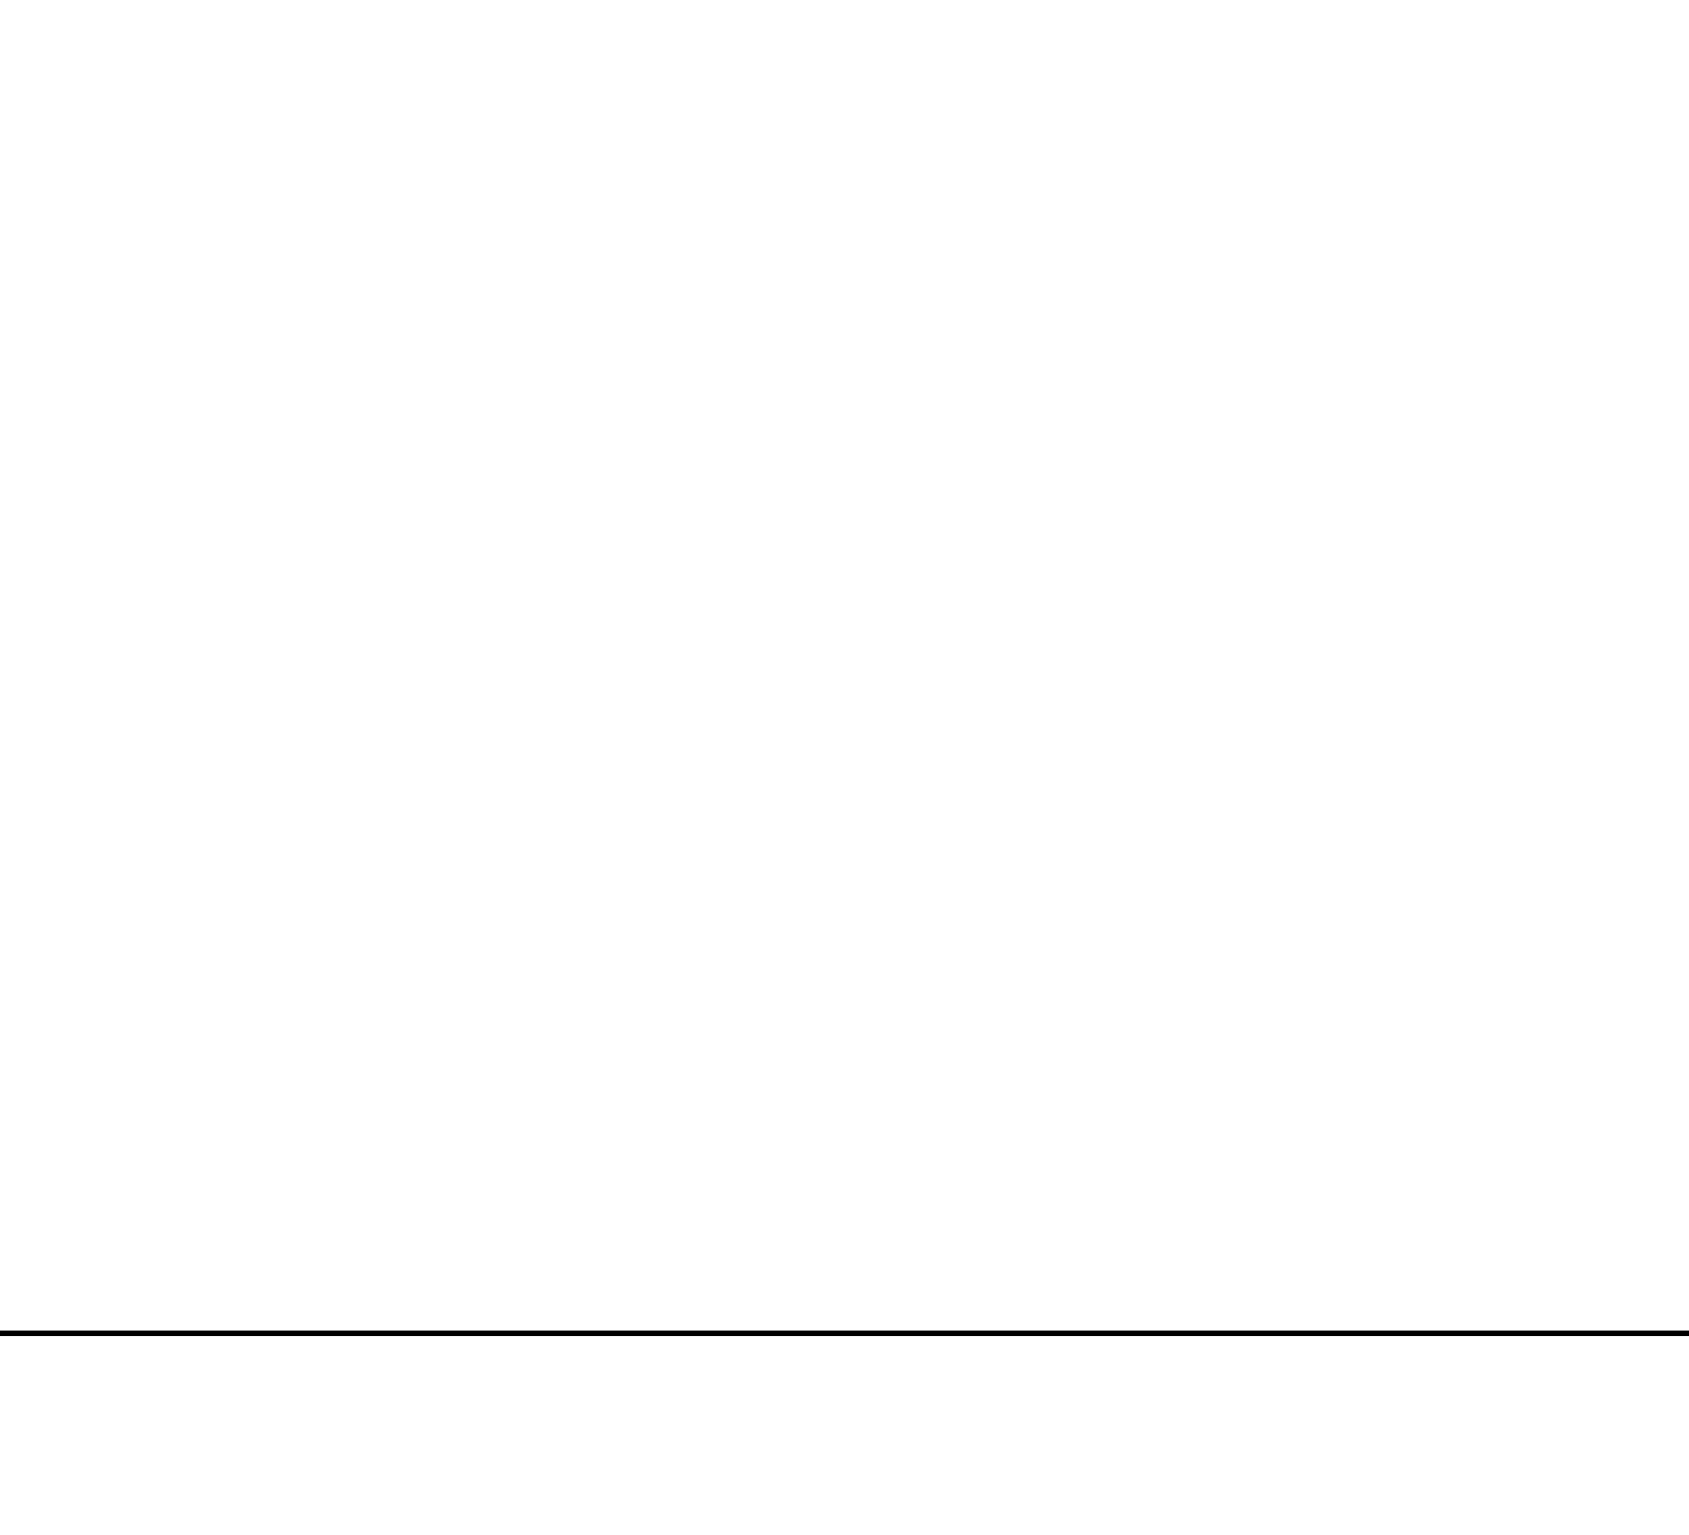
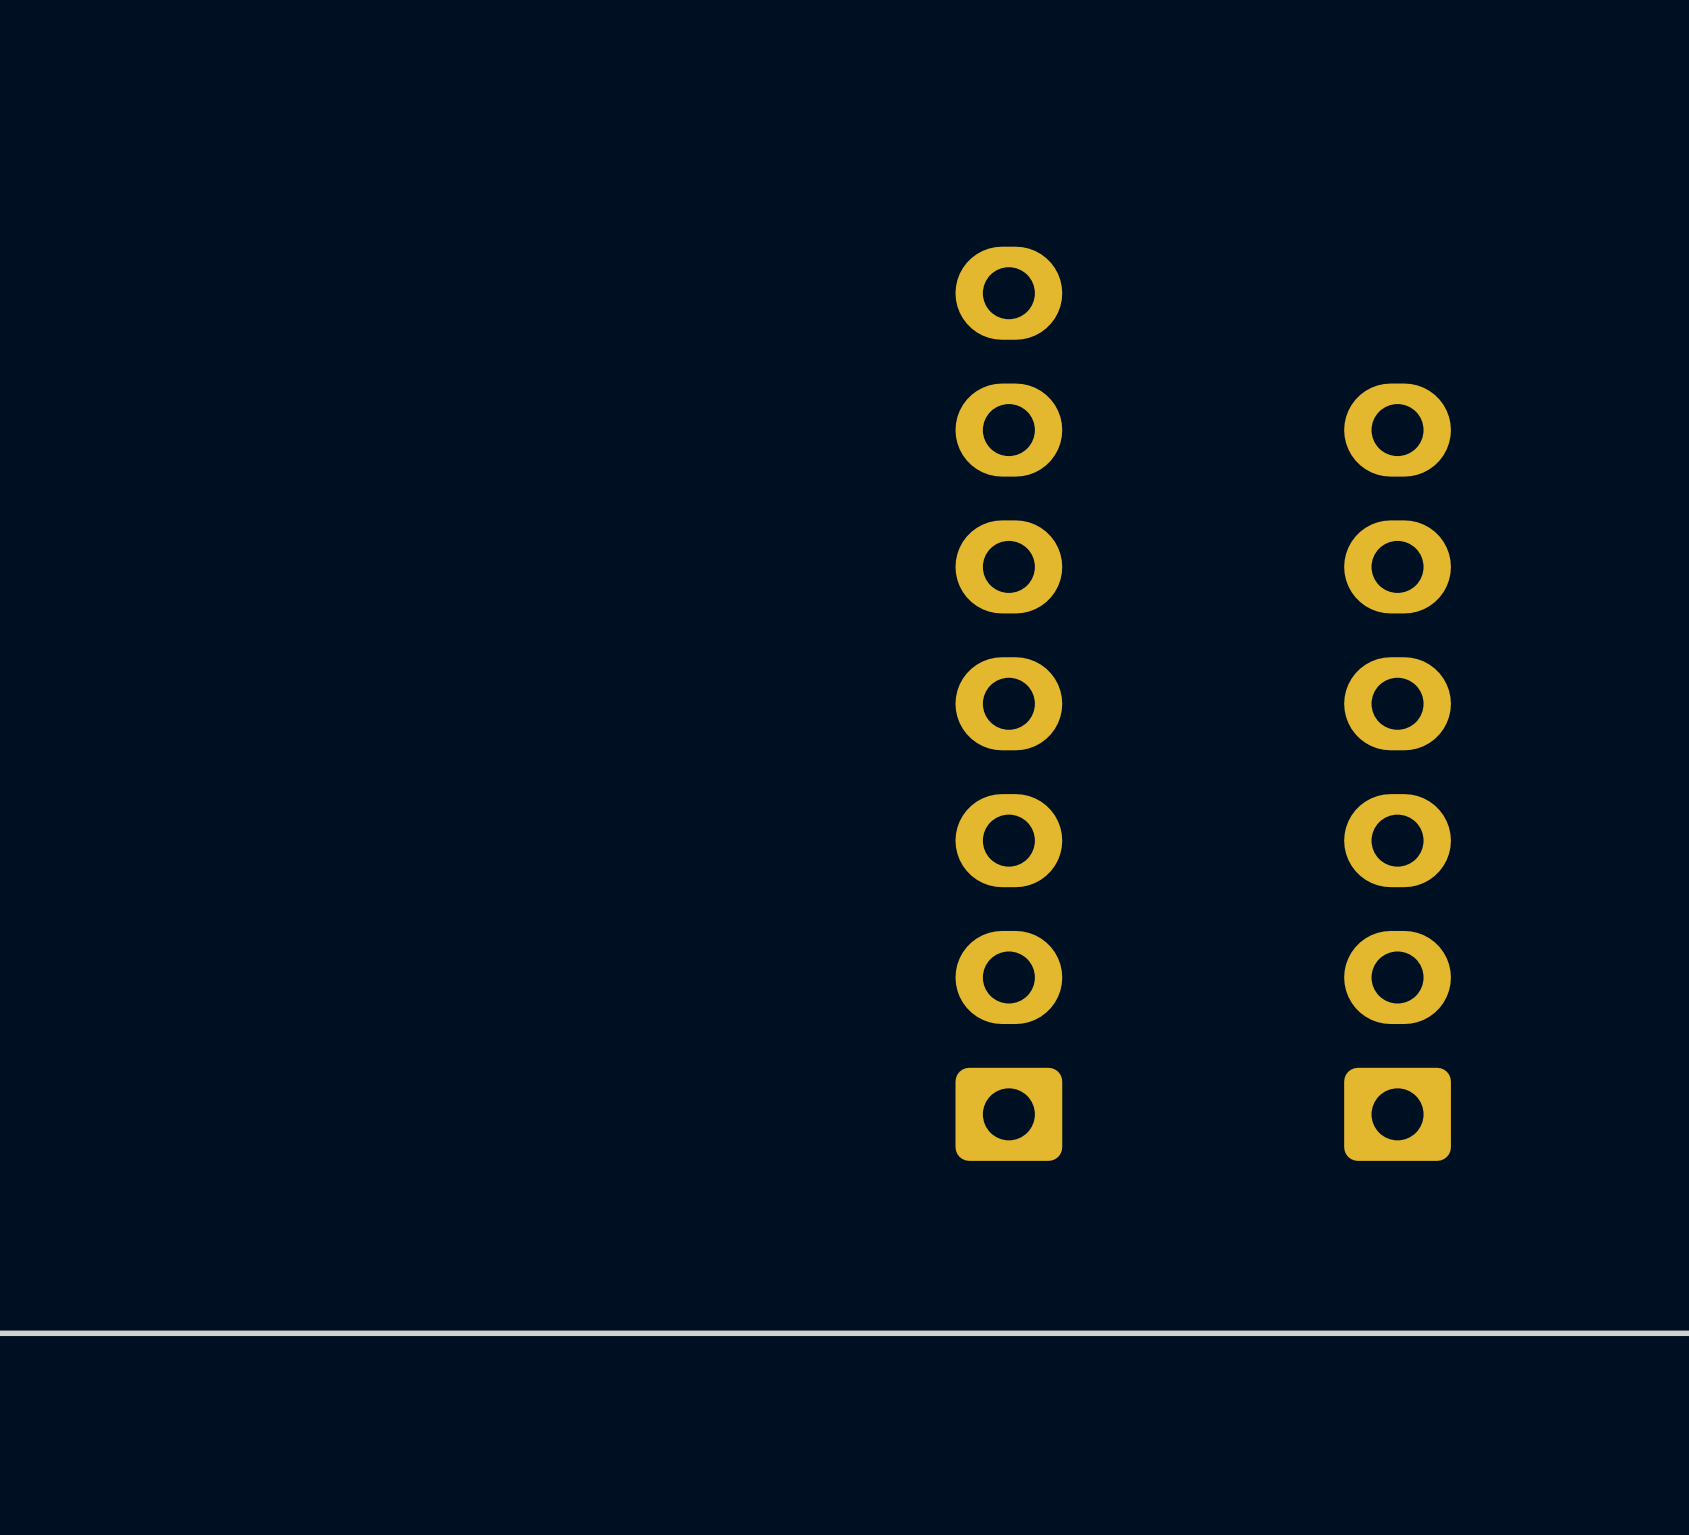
part: none -> (1008, 703)
part: none -> (1397, 772)

